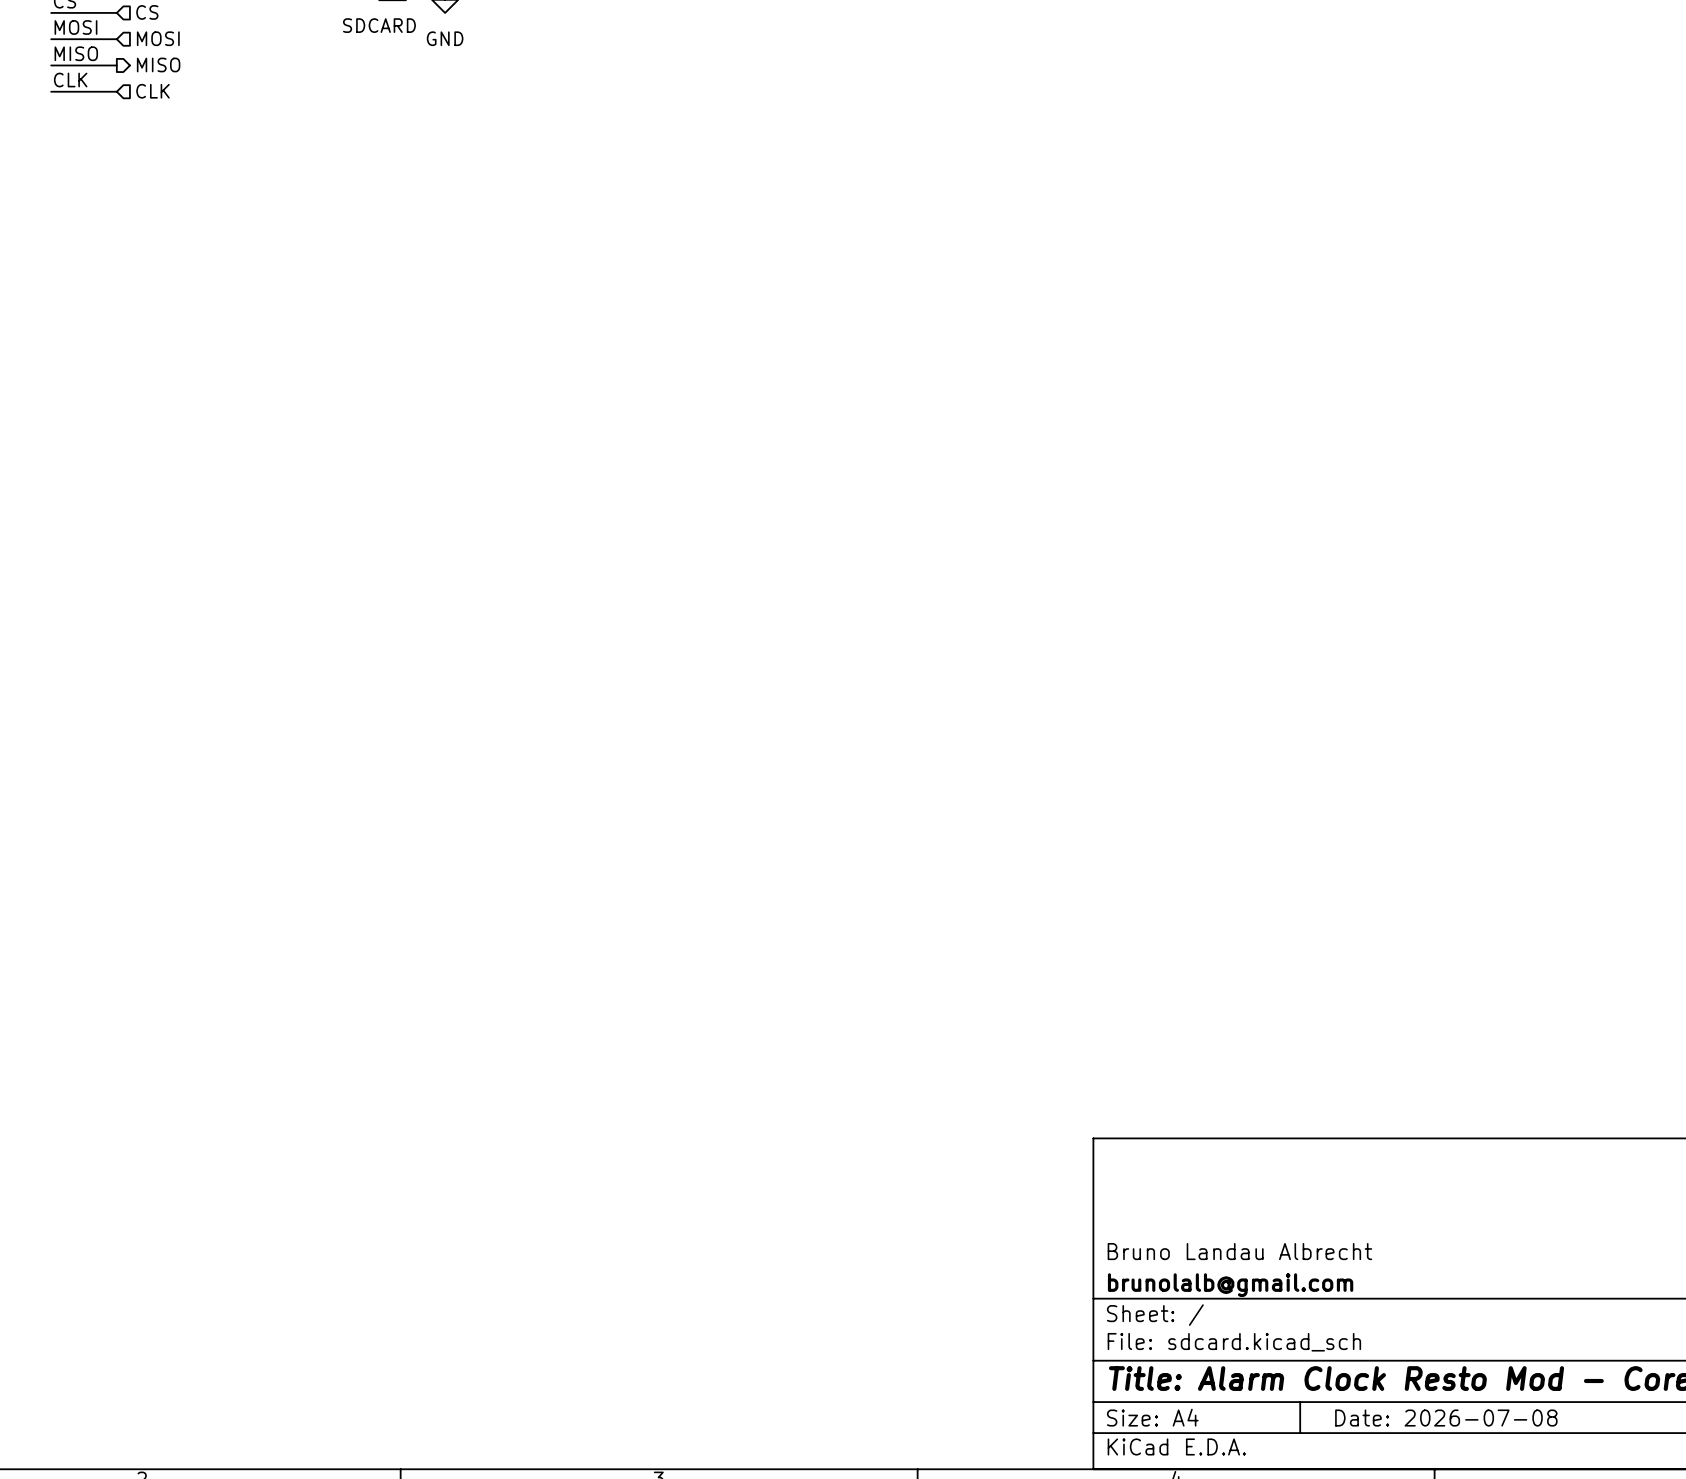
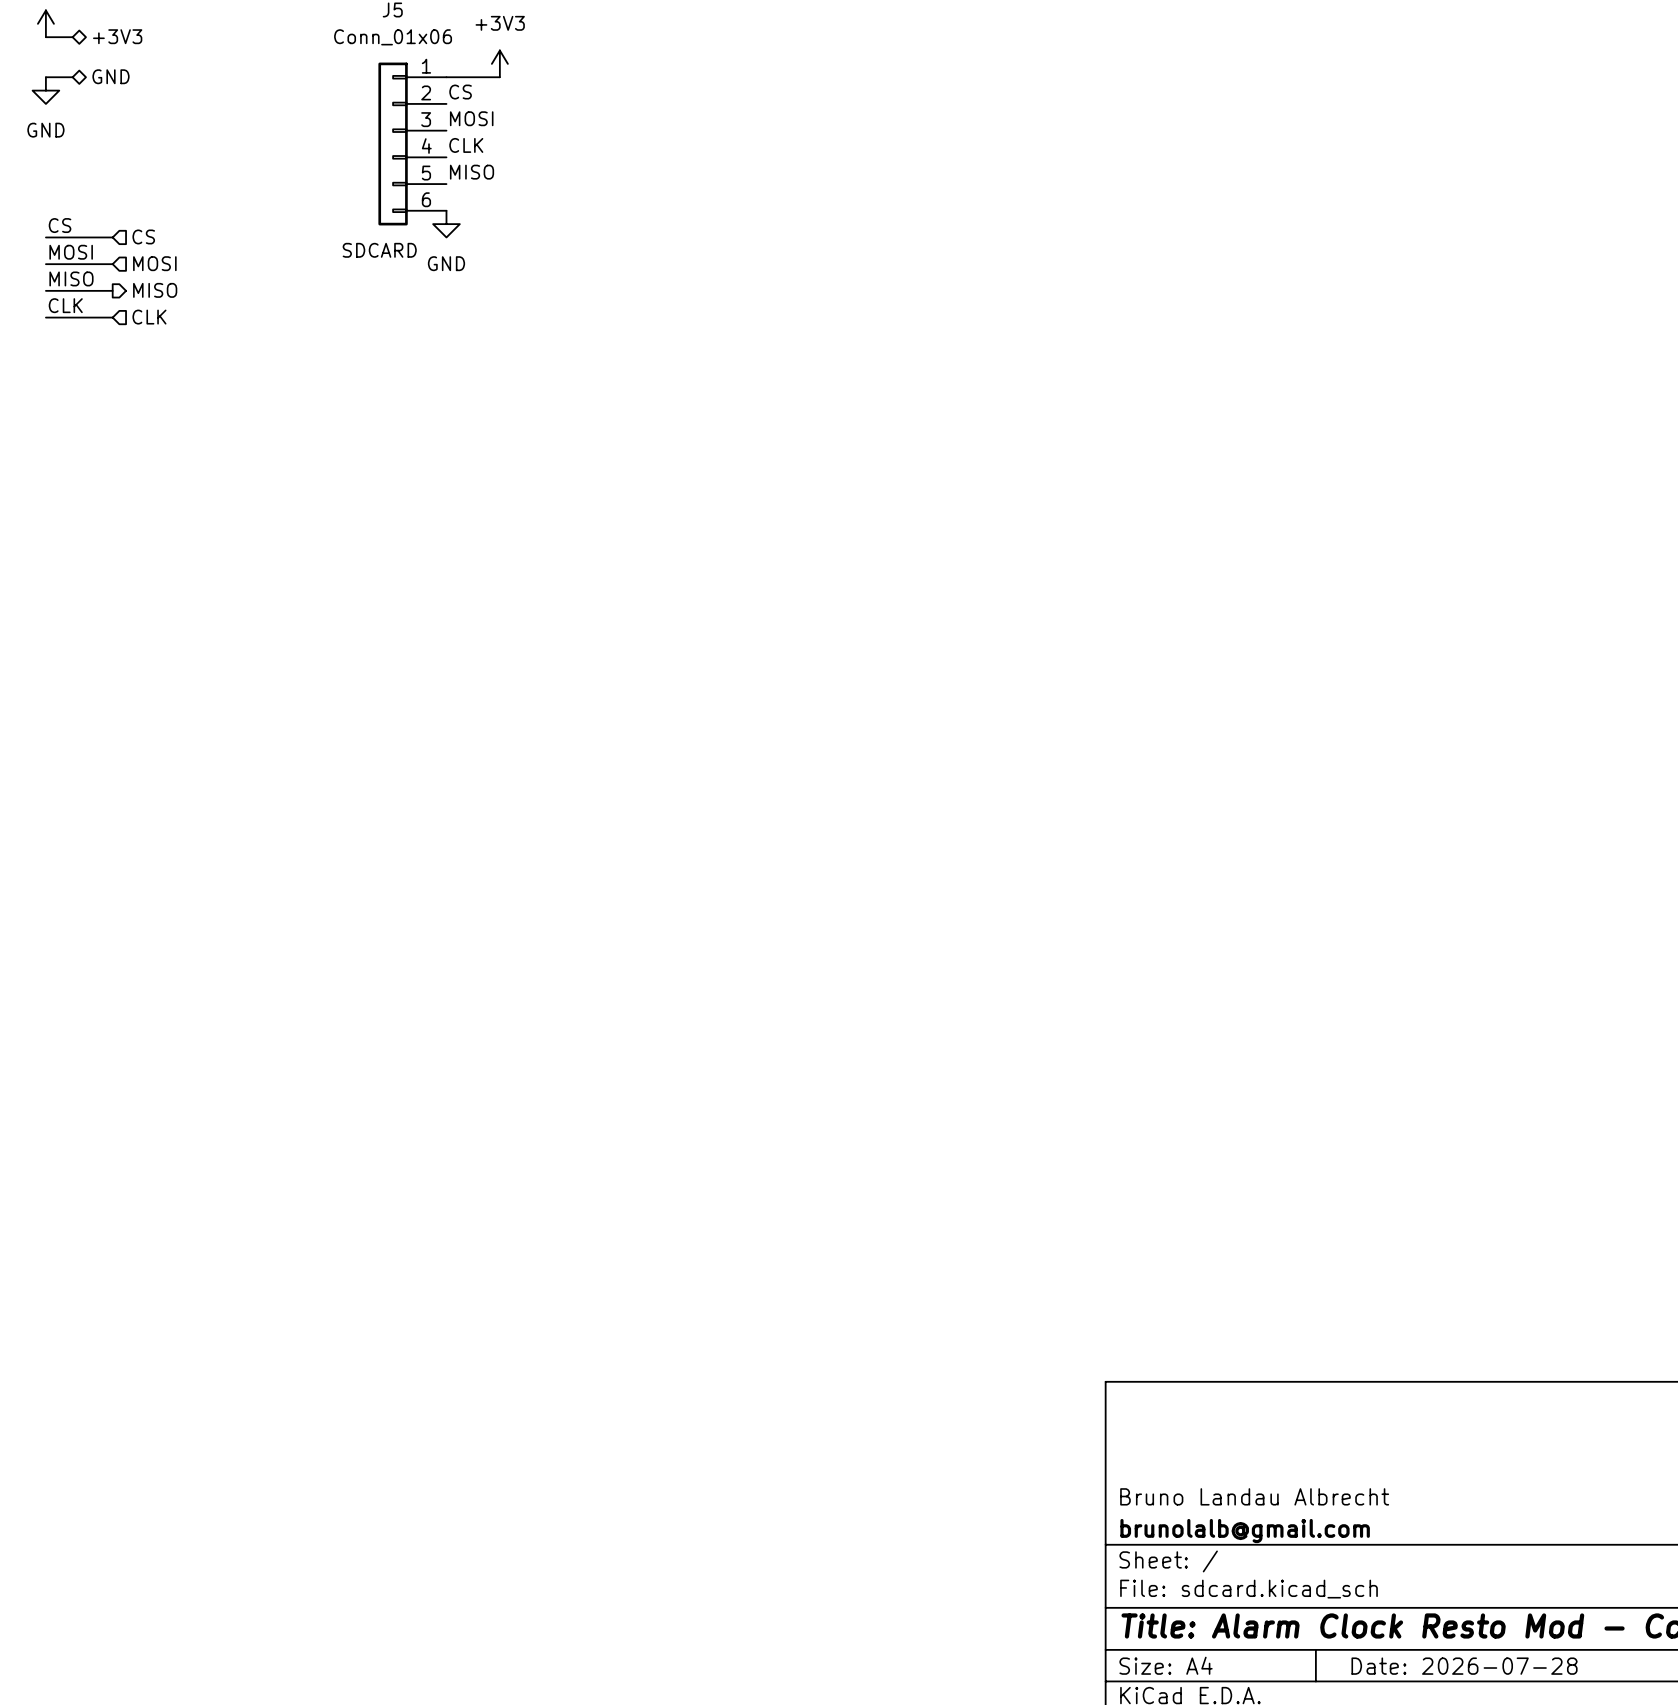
title block: Date: 2026-07-08 (1446, 1418) -> Date: 2026-07-28 (1464, 1666)

